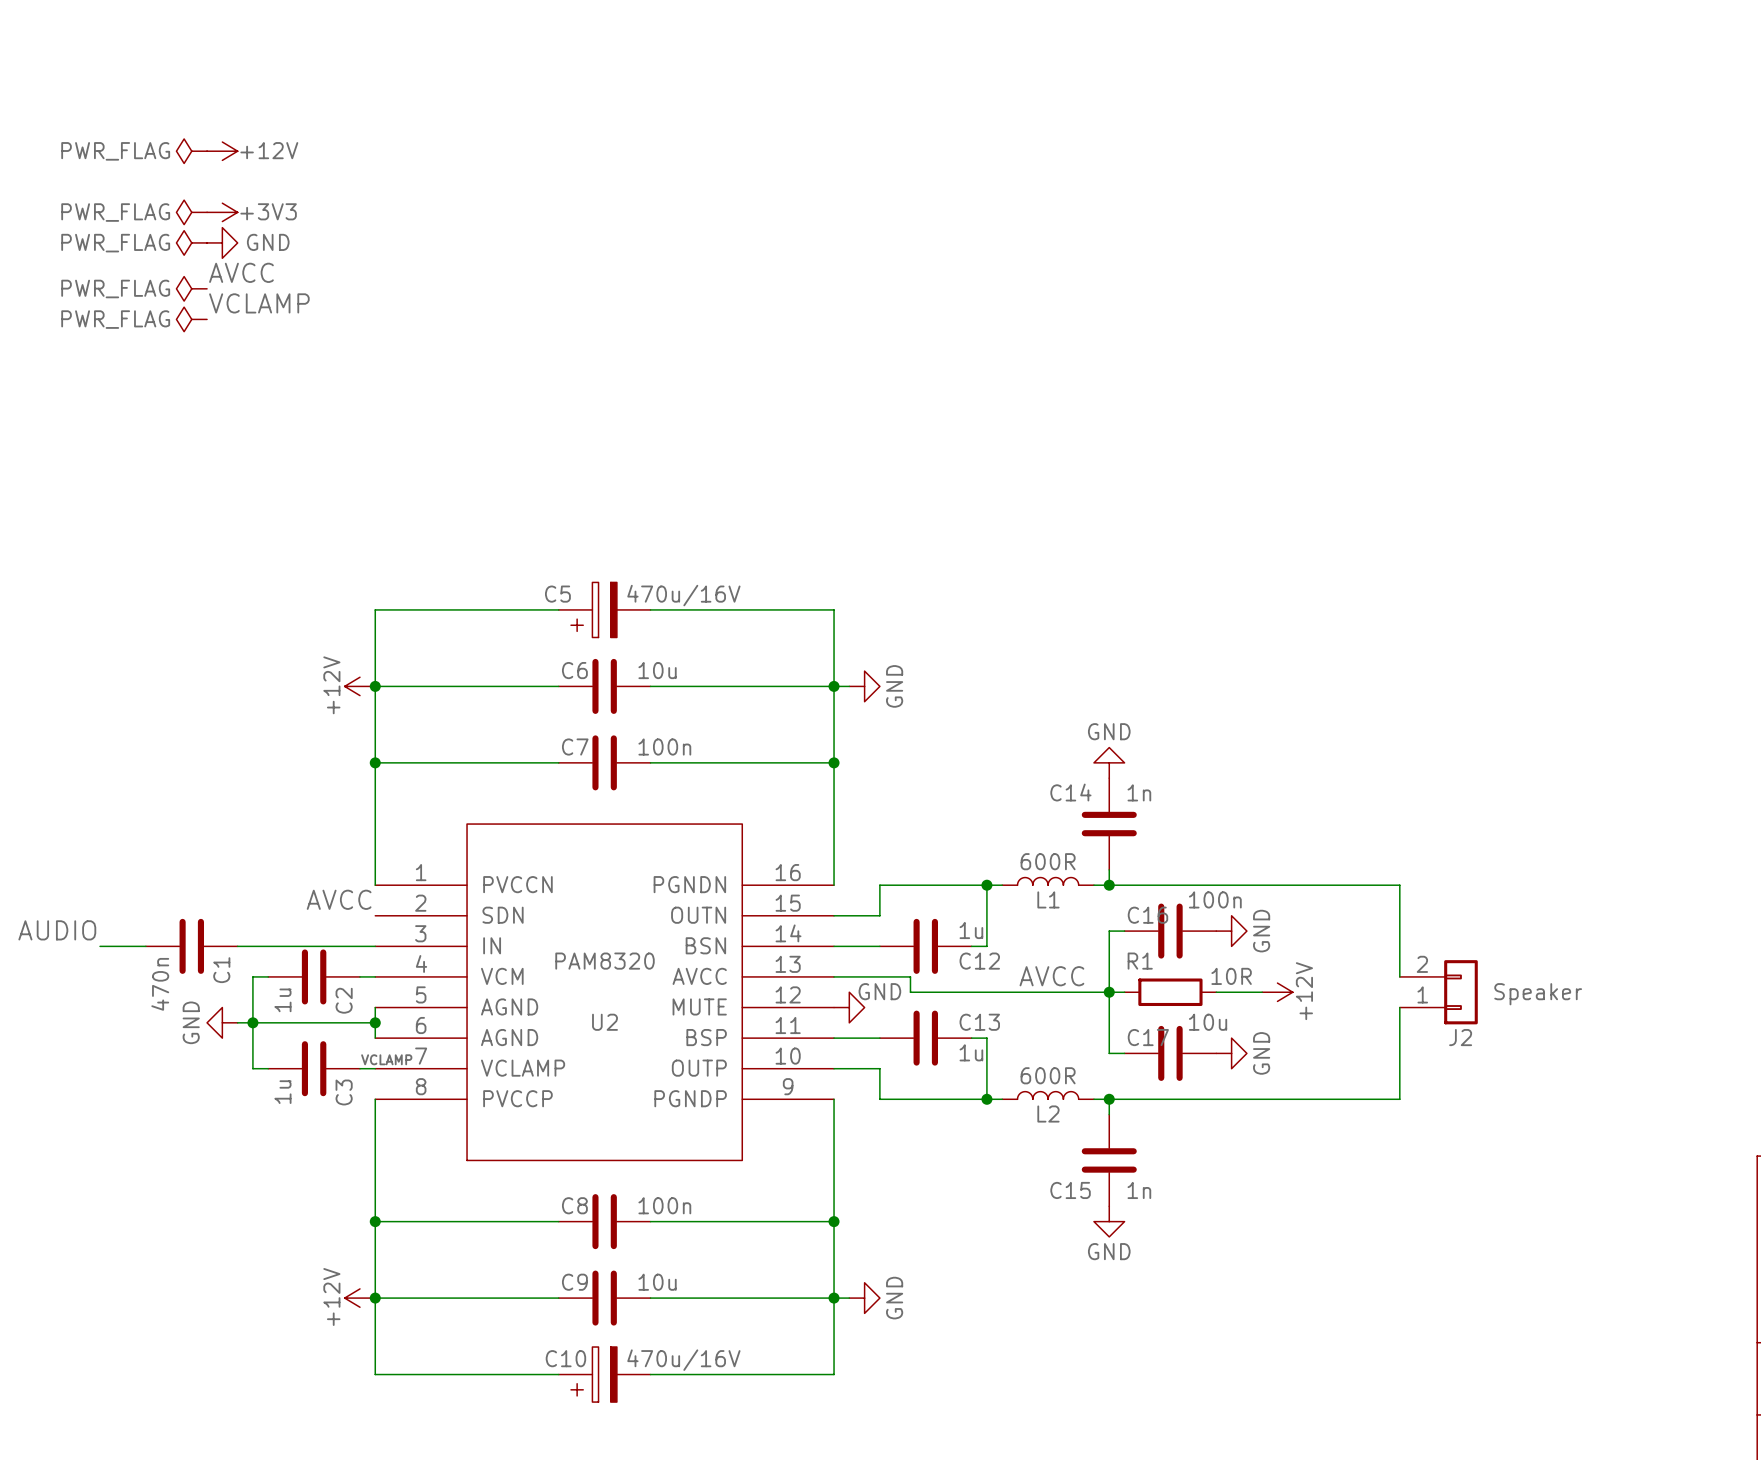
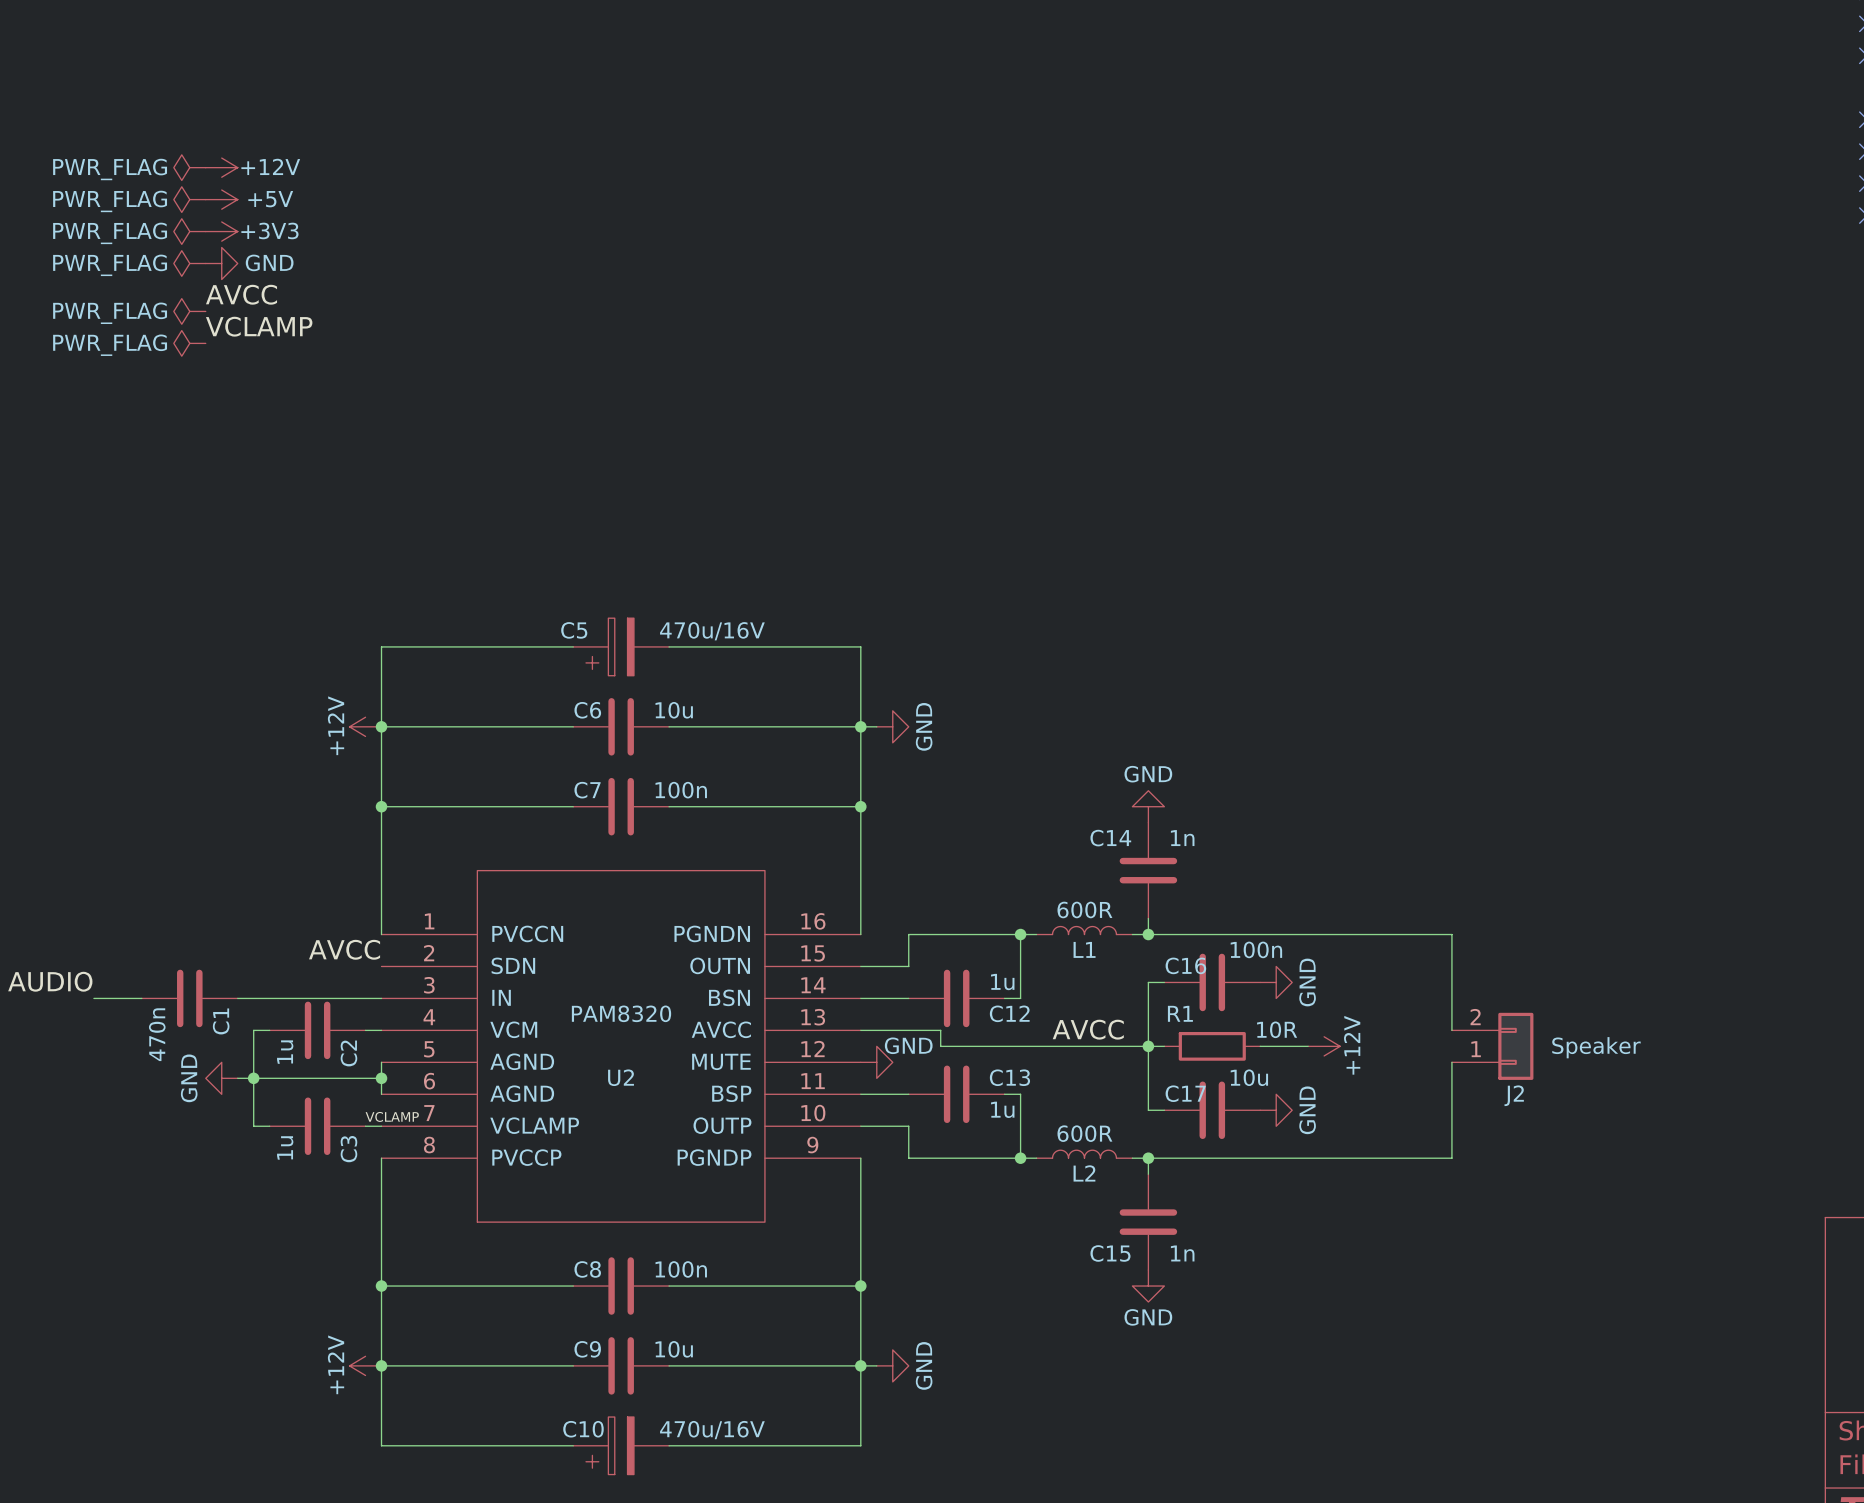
power symbol: none -> PWR_FLAG (189, 199)
power symbol: none -> +5V (221, 199)

